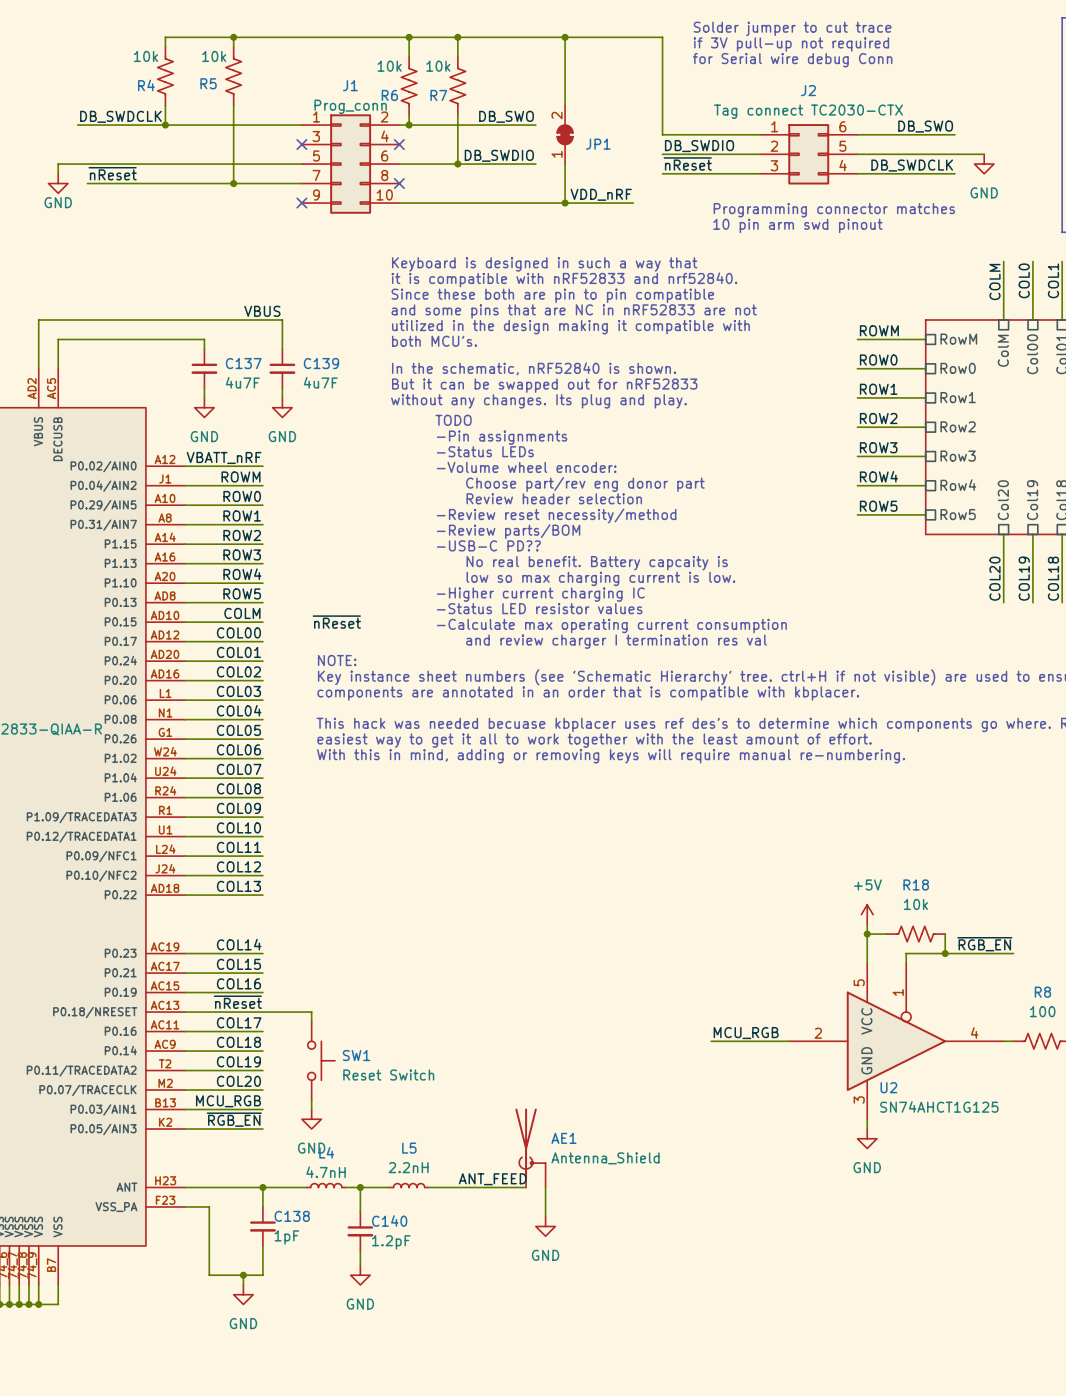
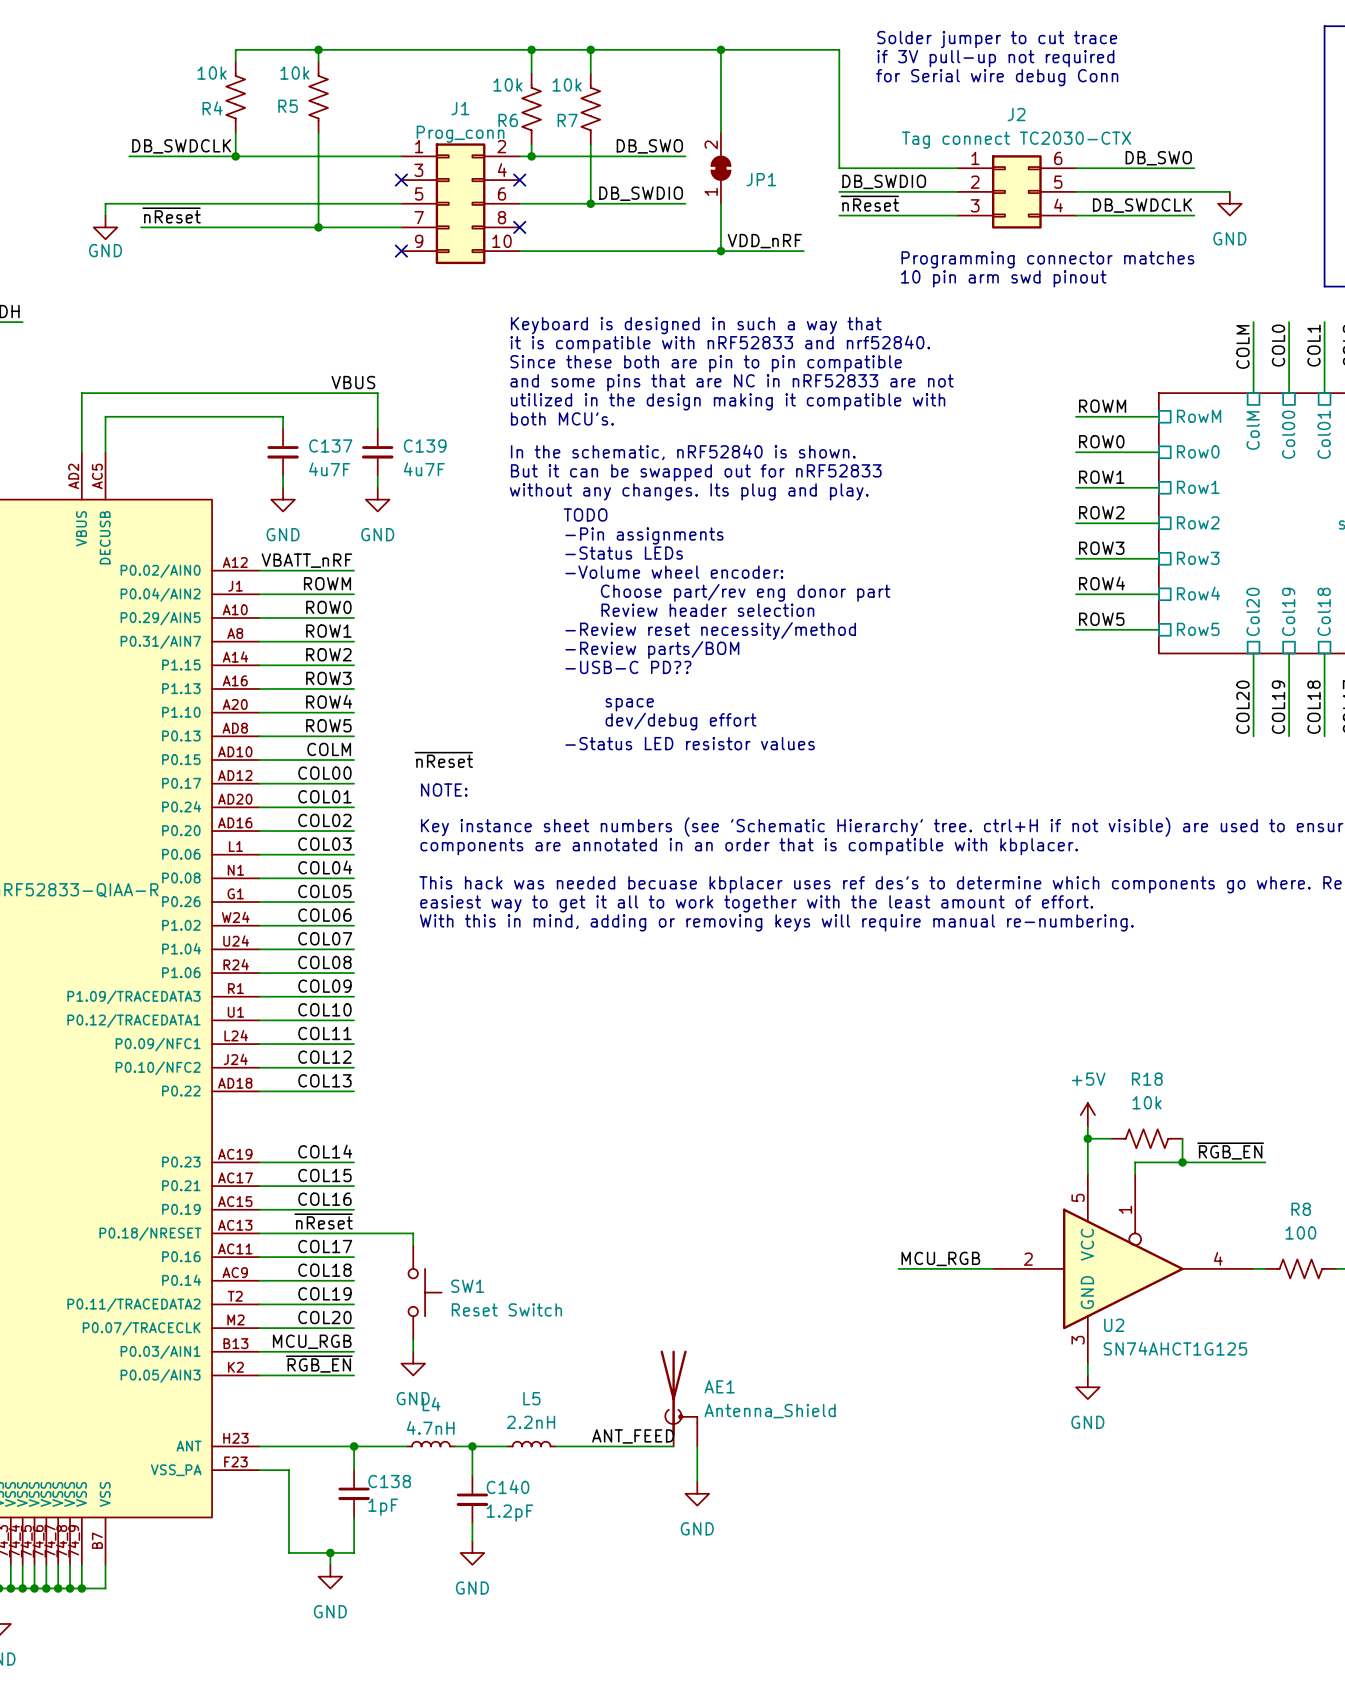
text: No real benefit. Battery capcaity is (597, 563) -> none
text: low so max charging current is low. (600, 578) -> space (629, 704)
text: -Higher current charging IC (540, 594) -> dev/debug effort (681, 721)
text: -Calculate max operating current consumption (611, 625) -> none
text: and review charger I termination res val (616, 641) -> none
text position: NOTE: (337, 660) -> NOTE: (444, 790)

